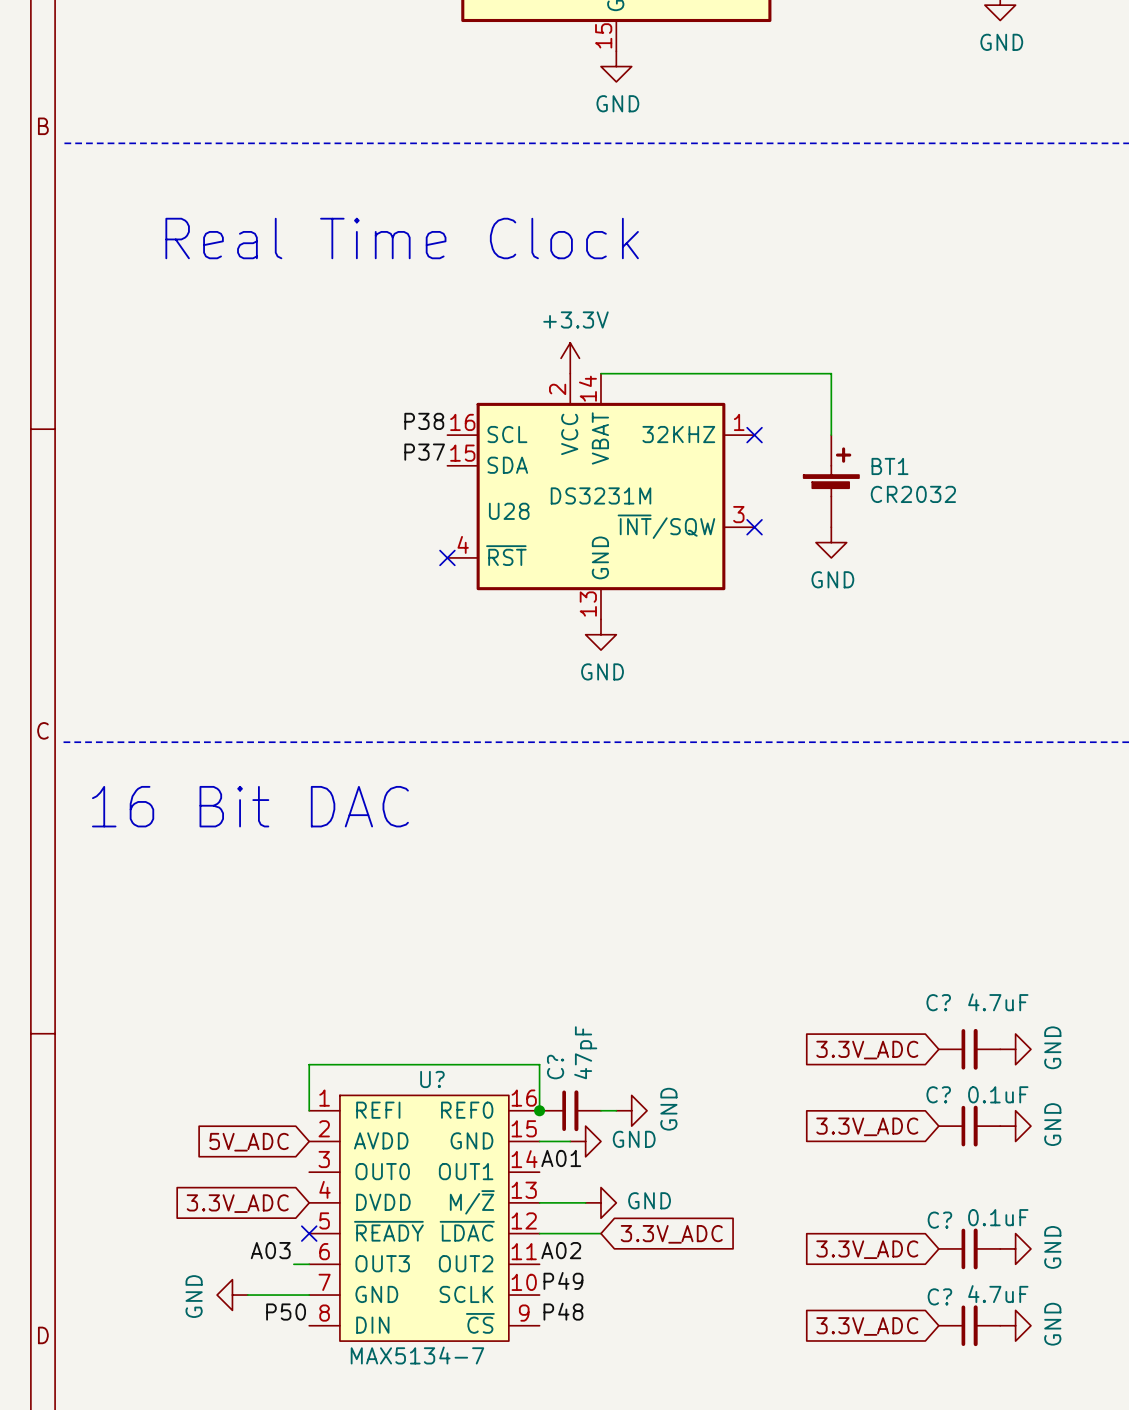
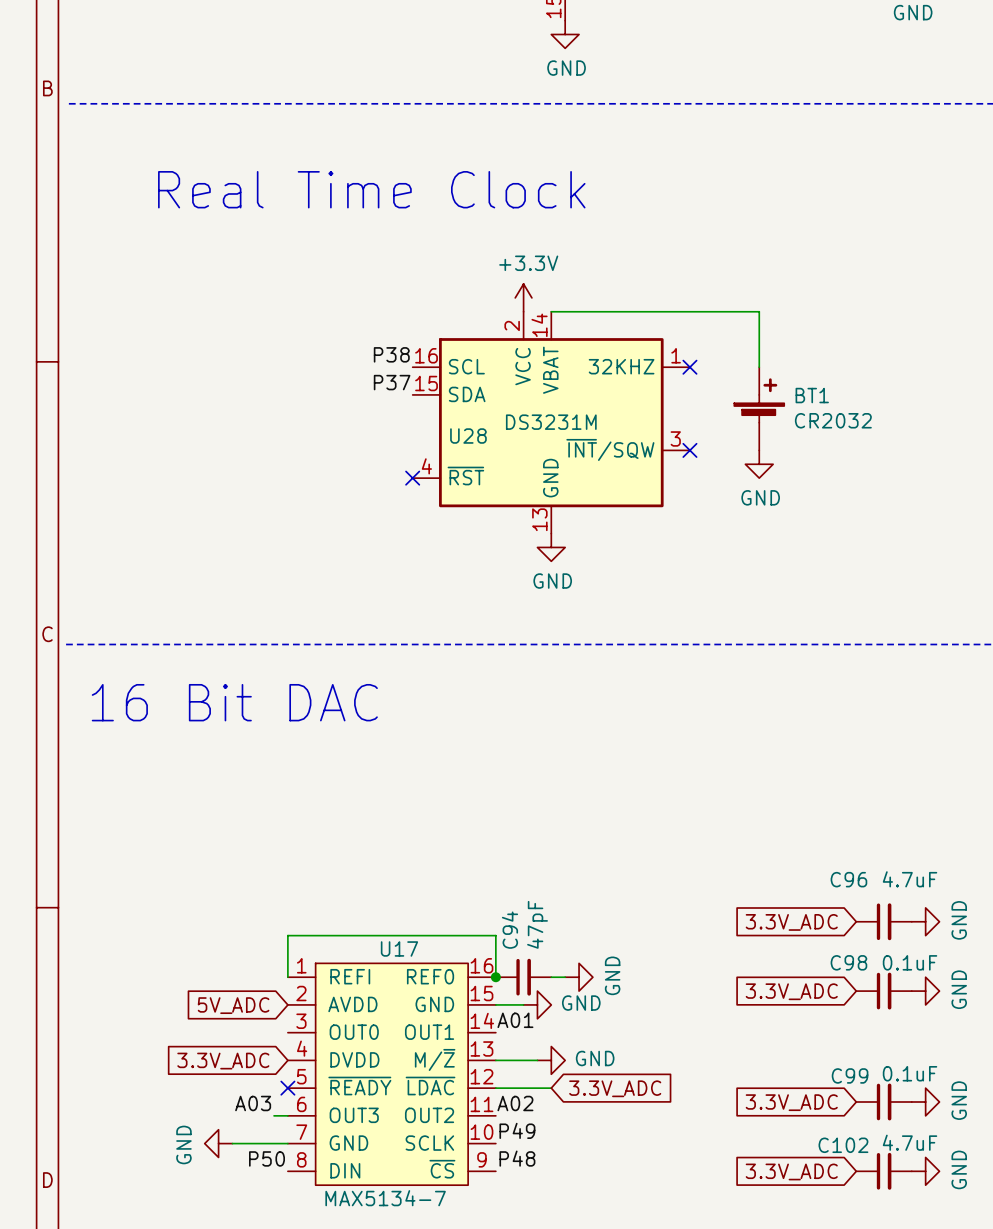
C? name: C? (938, 1002) -> C96 (848, 879)
C? name: C? (555, 1067) -> C94 (509, 930)
U? name: U? (432, 1079) -> U17 (399, 948)
C? name: C? (938, 1094) -> C98 (848, 962)
C? name: C? (939, 1220) -> C99 (850, 1075)
C? name: C? (939, 1296) -> C102 (843, 1145)

